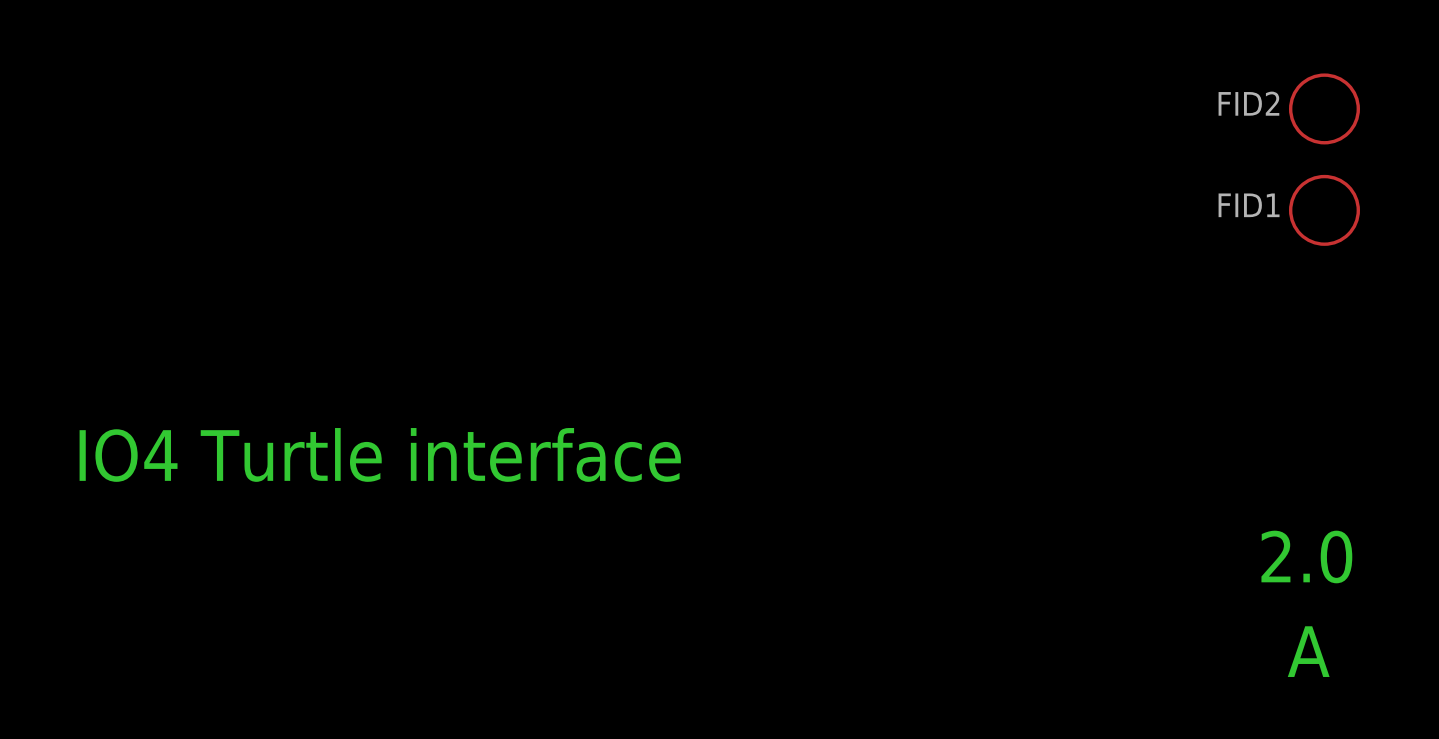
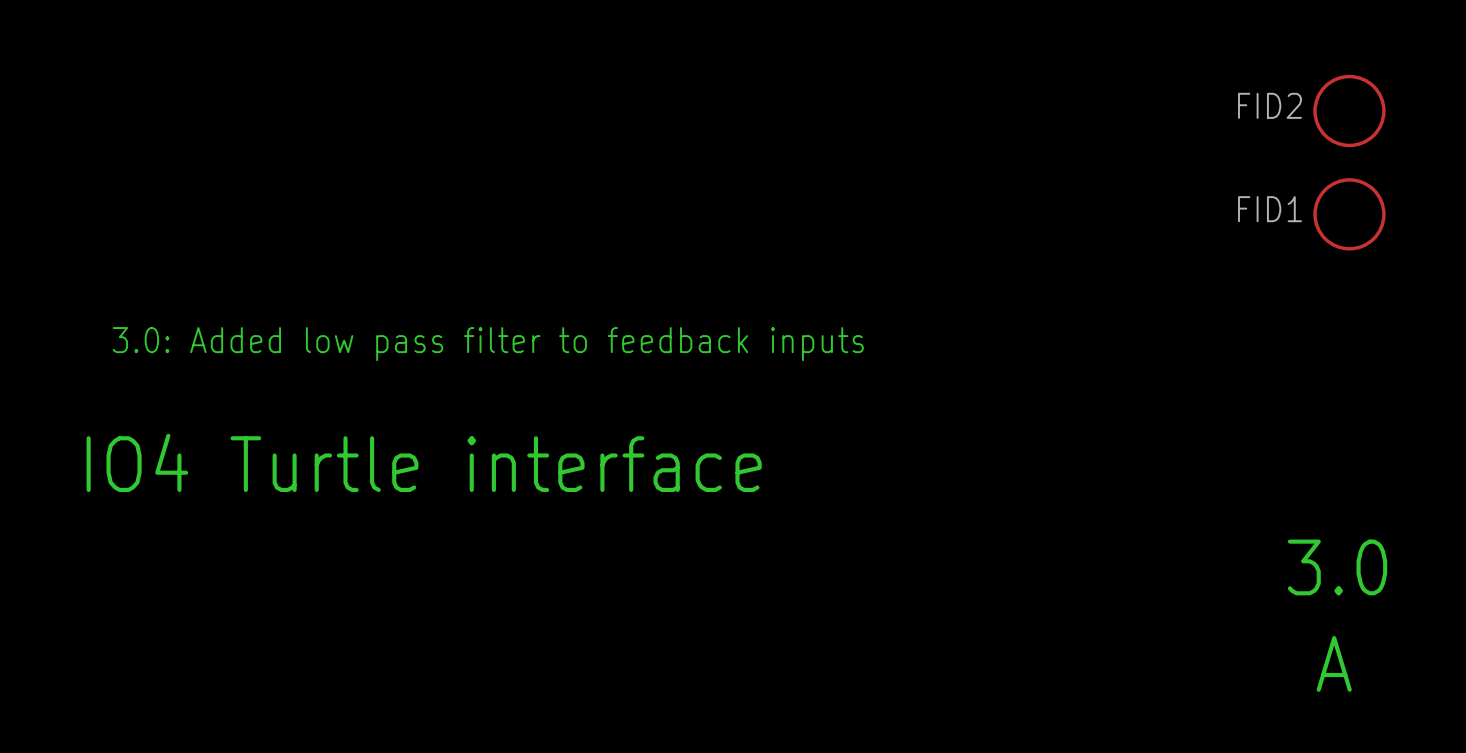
text: none -> 3.0: Added low pass filter to feedback inputs (488, 344)
text: 2.0 (1306, 556) -> 3.0 (1337, 567)

